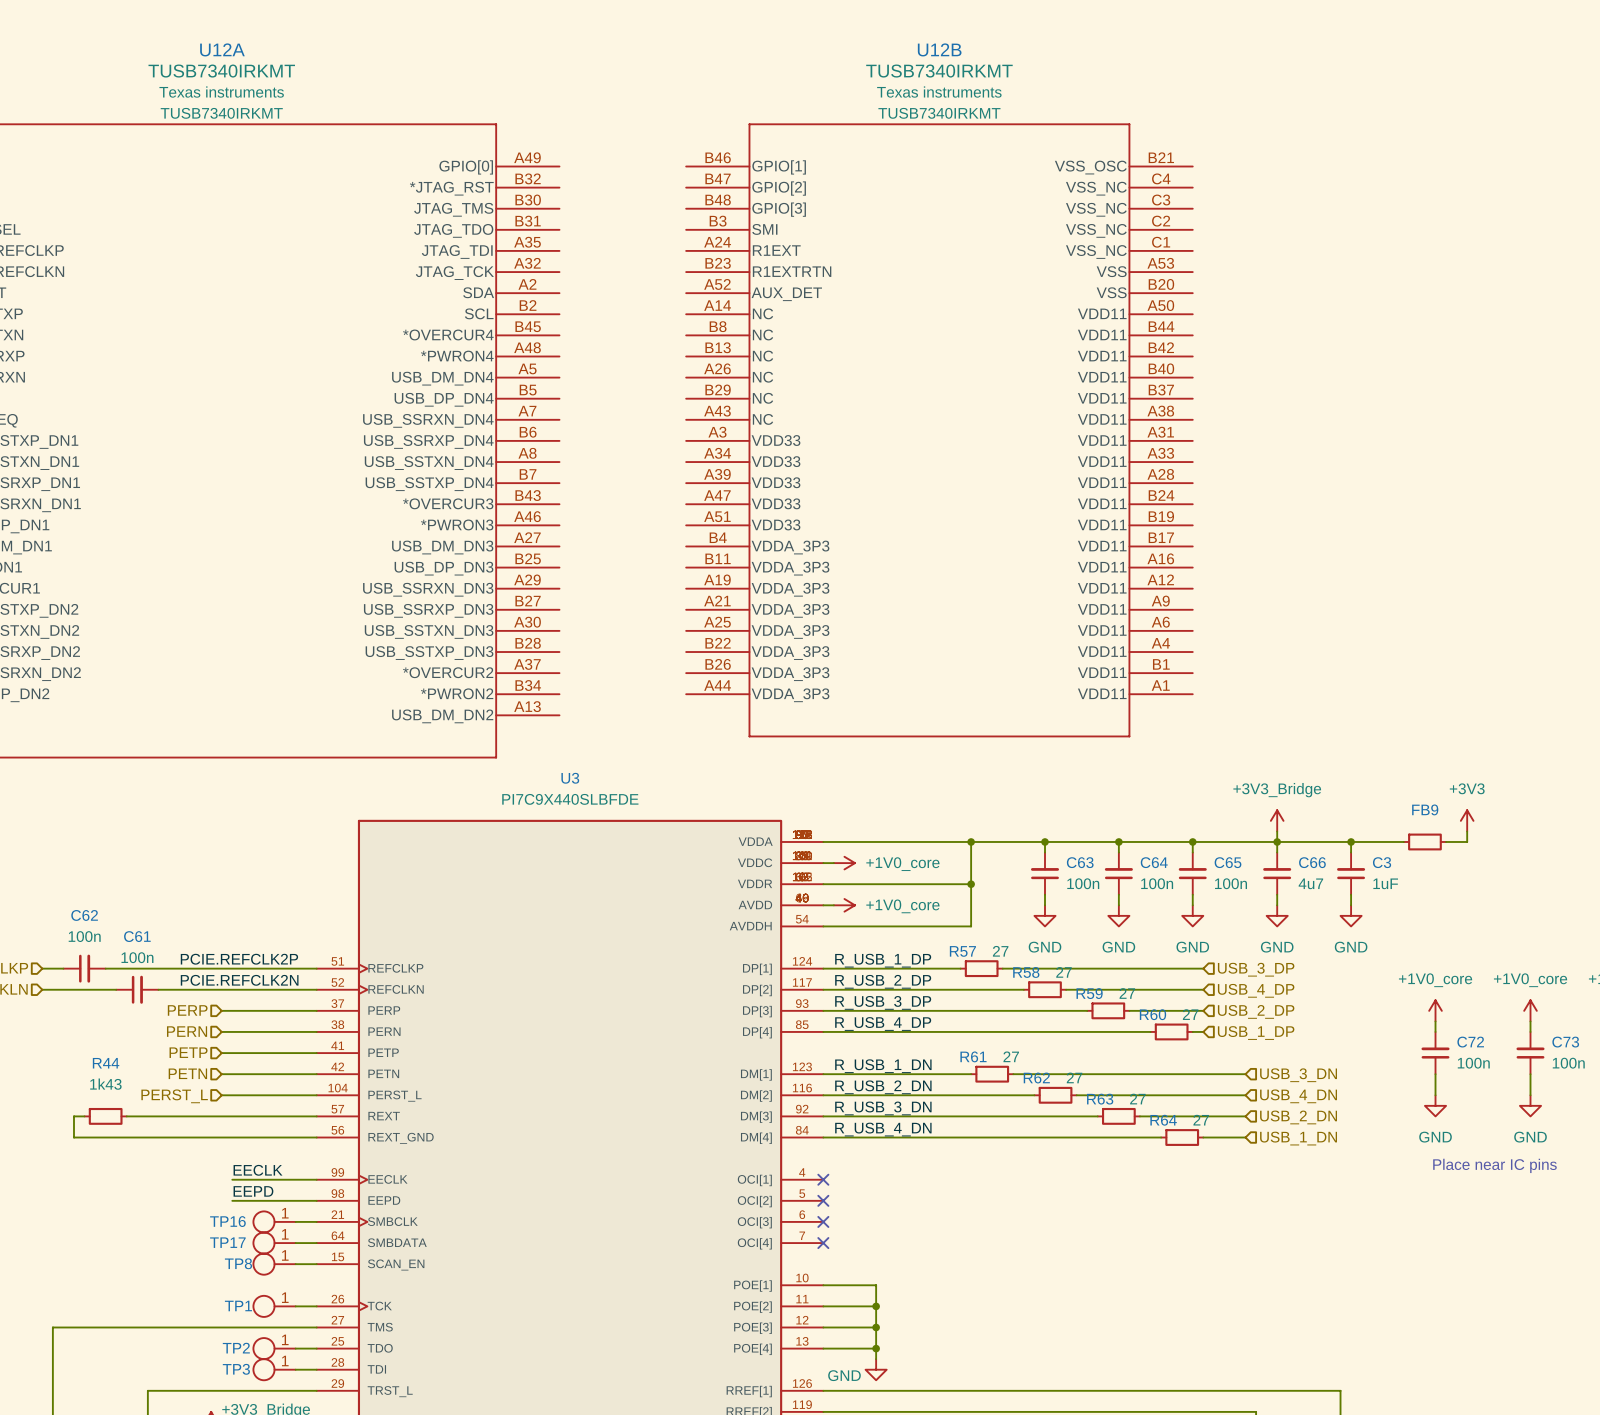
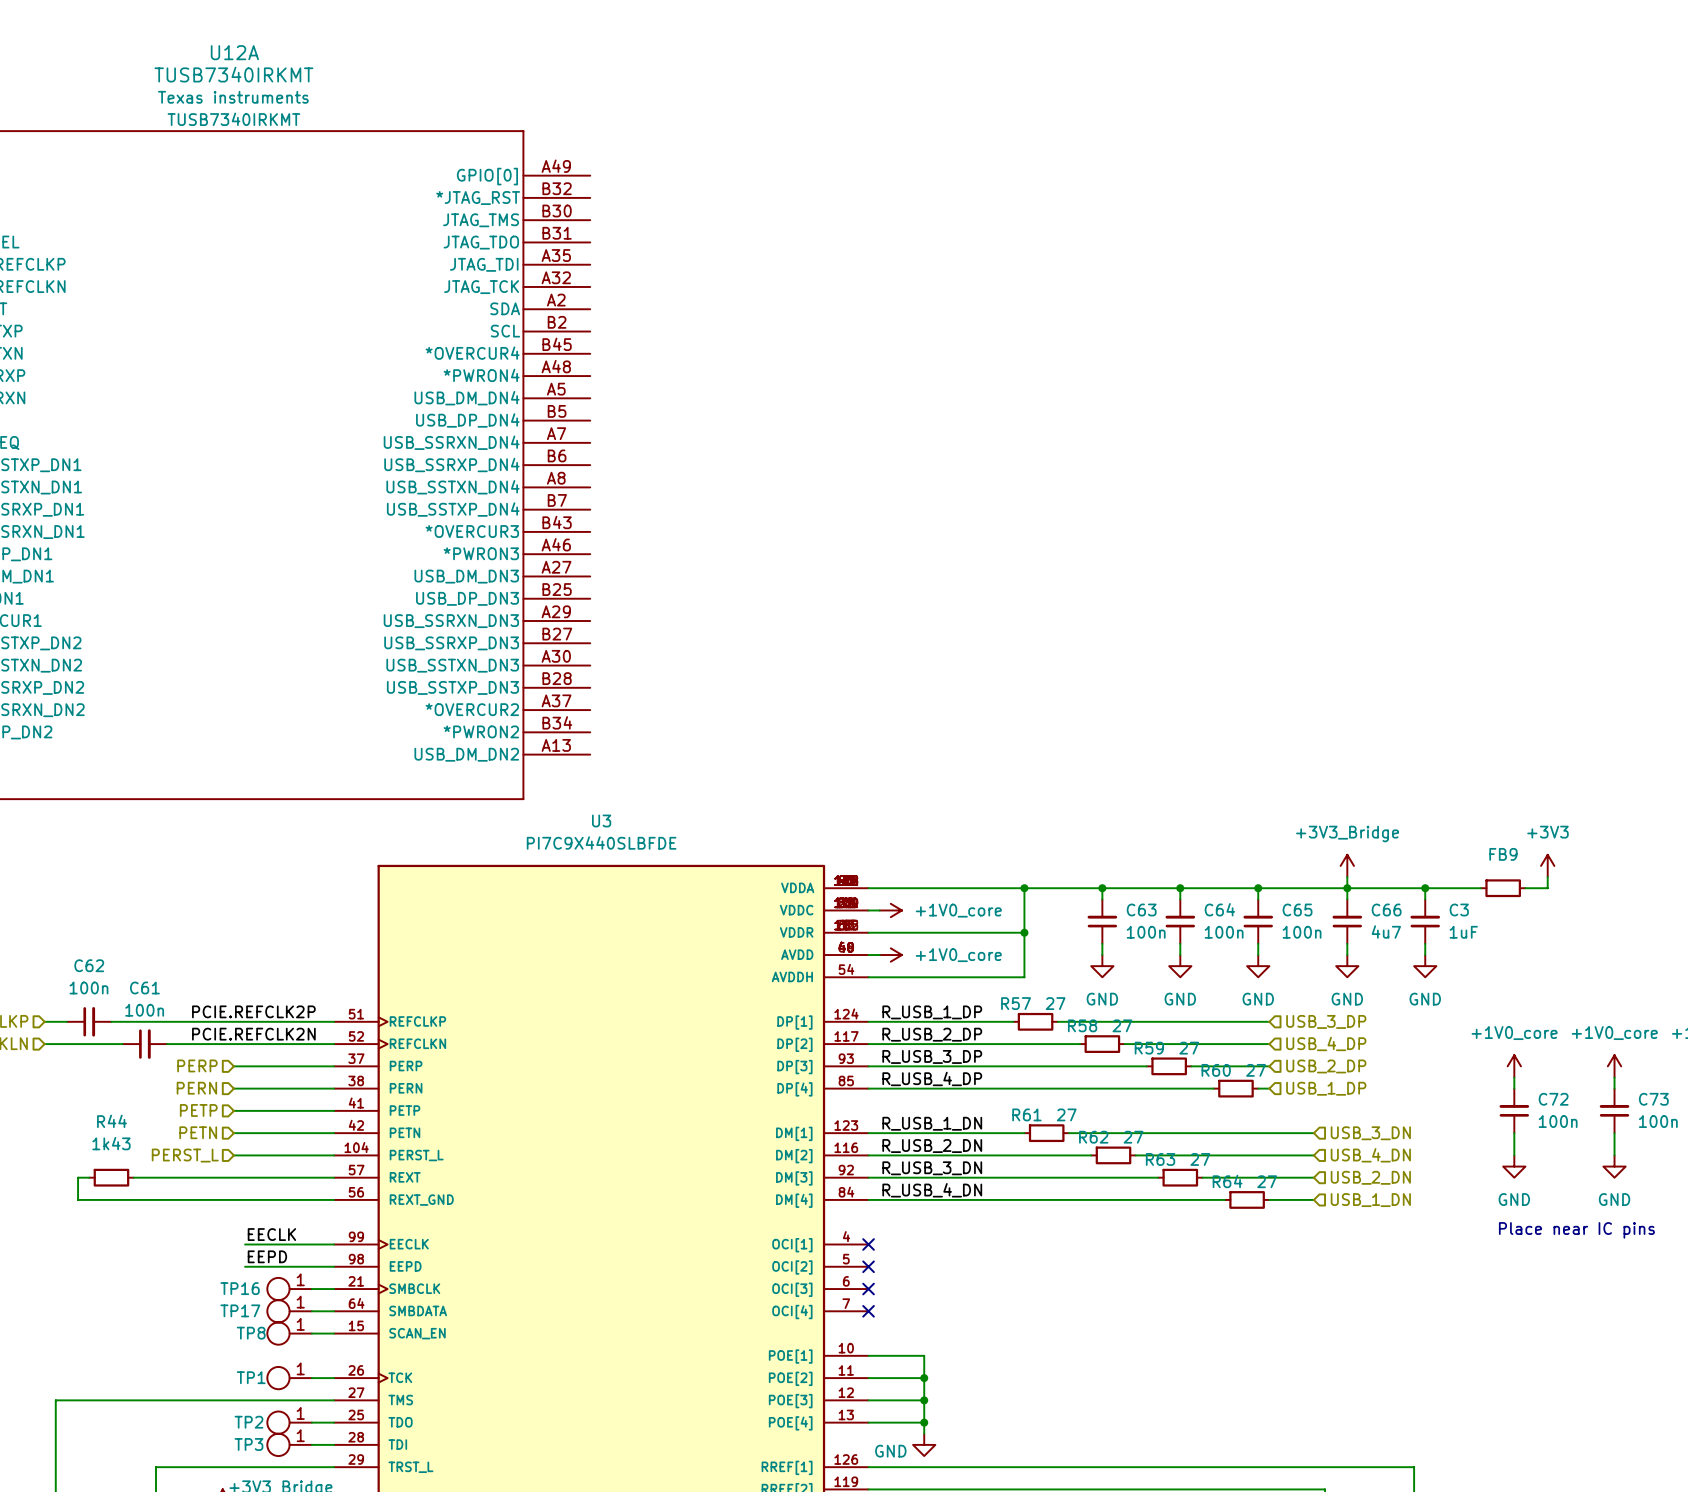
U12B: TUSB7340IRKMT (939, 430) -> none

